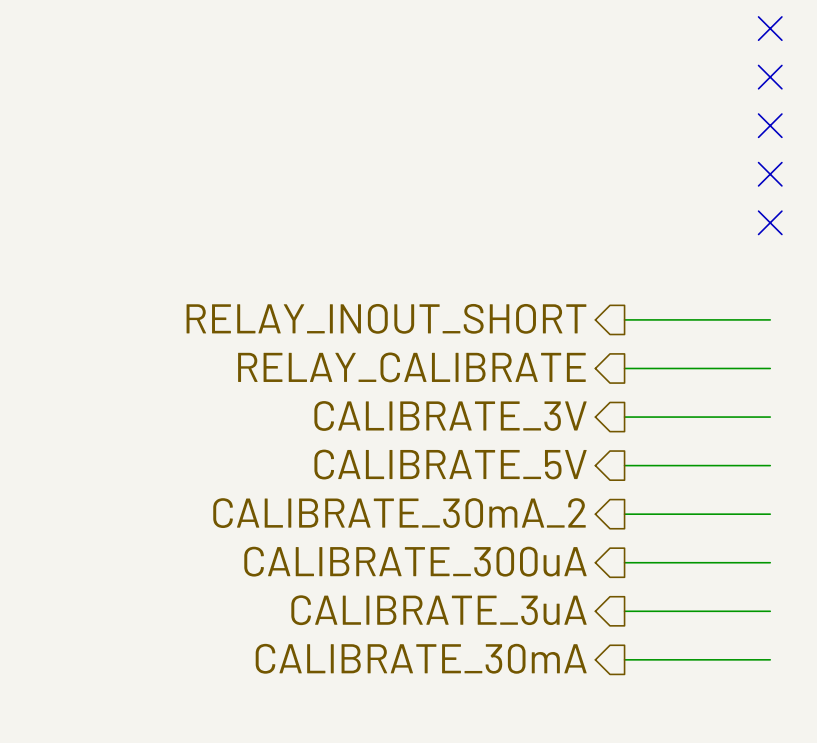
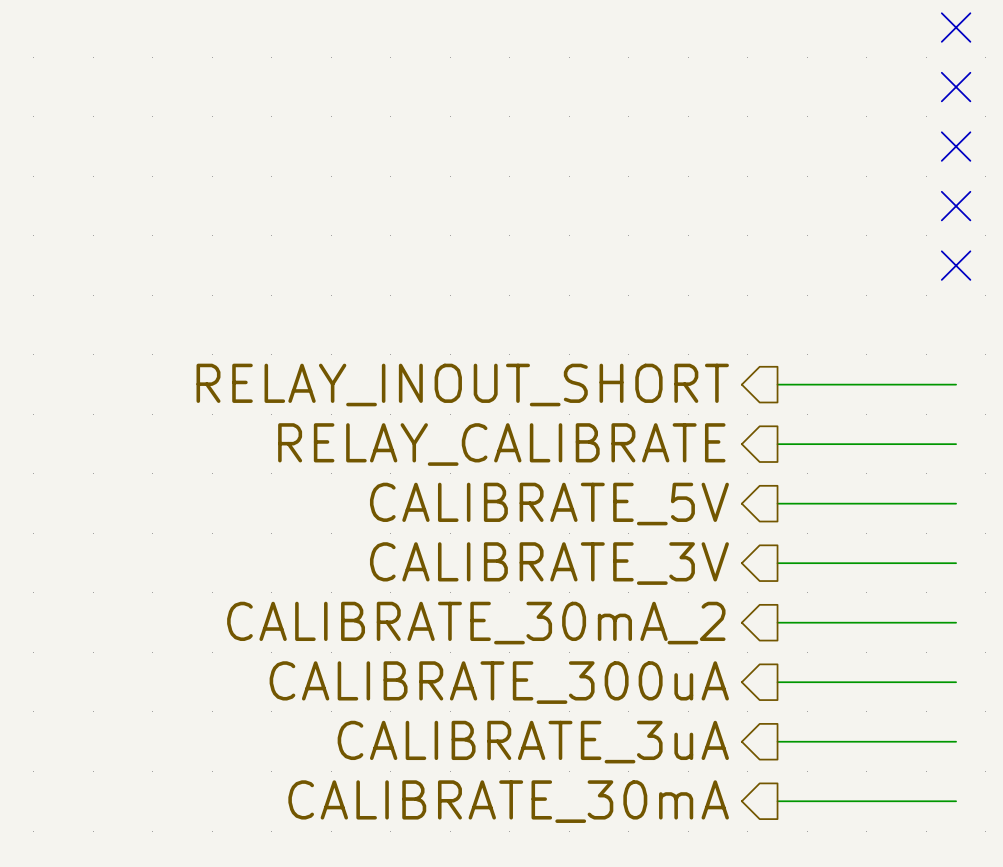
hierarchical label: CALIBRATE_3V (450, 415) -> CALIBRATE_5V (549, 504)
hierarchical label: CALIBRATE_5V (450, 464) -> CALIBRATE_3V (549, 563)

